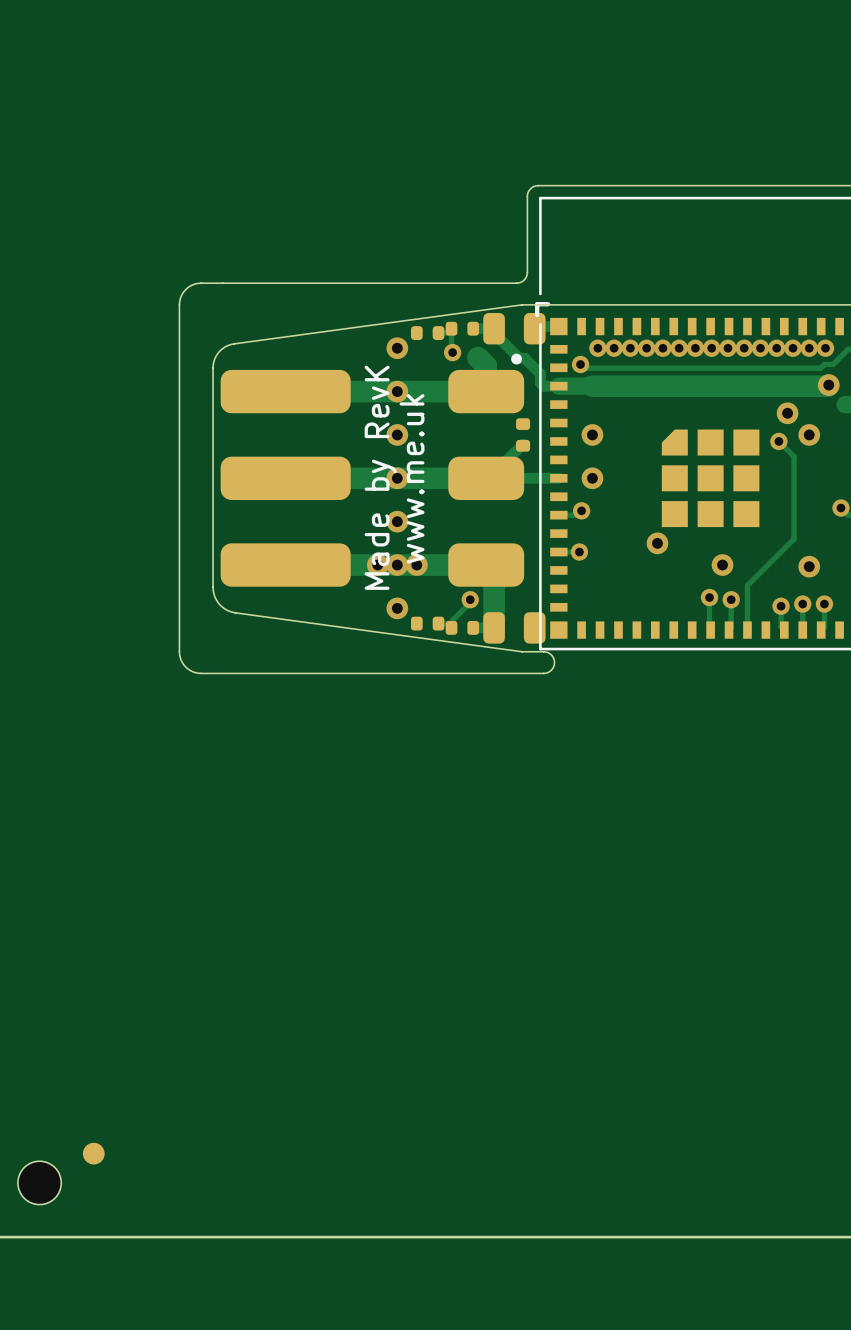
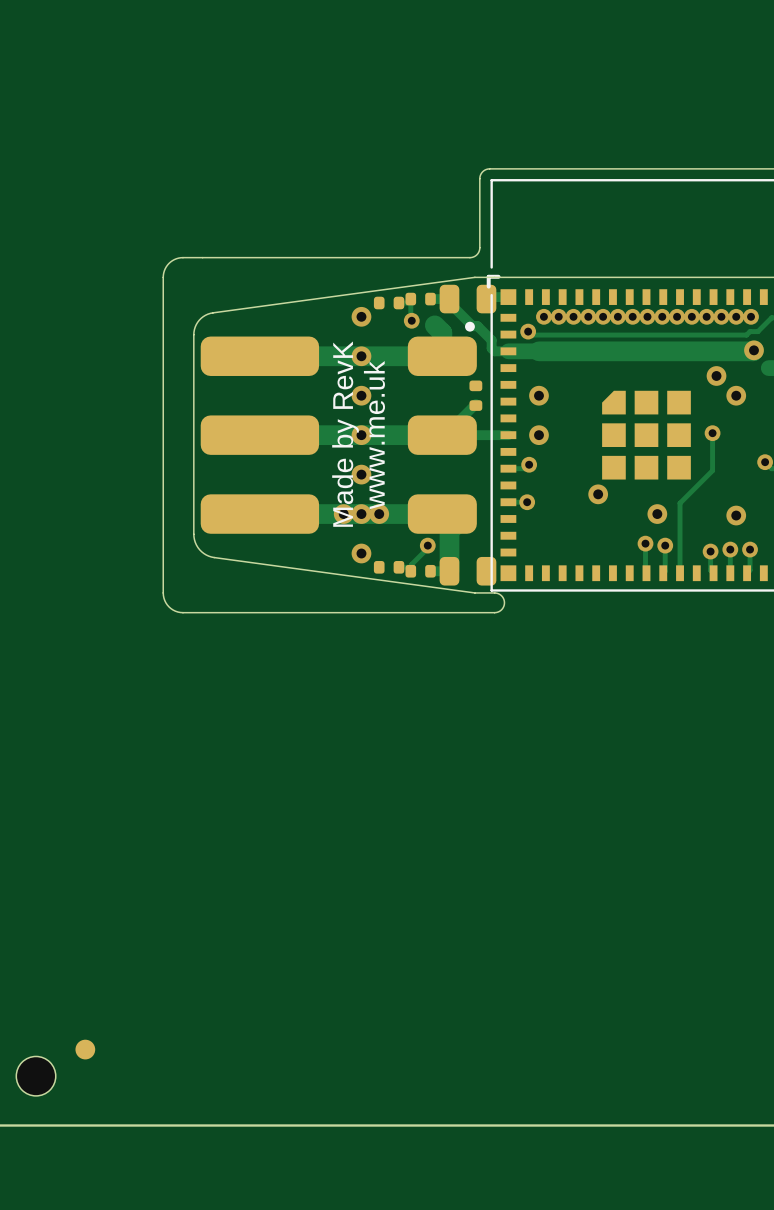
track: (778, 441) (794, 456) (794, 539) (747, 585) -> (712, 433) (712, 470) (680, 503) (680, 532)
via position: (778, 441) -> (712, 433)

